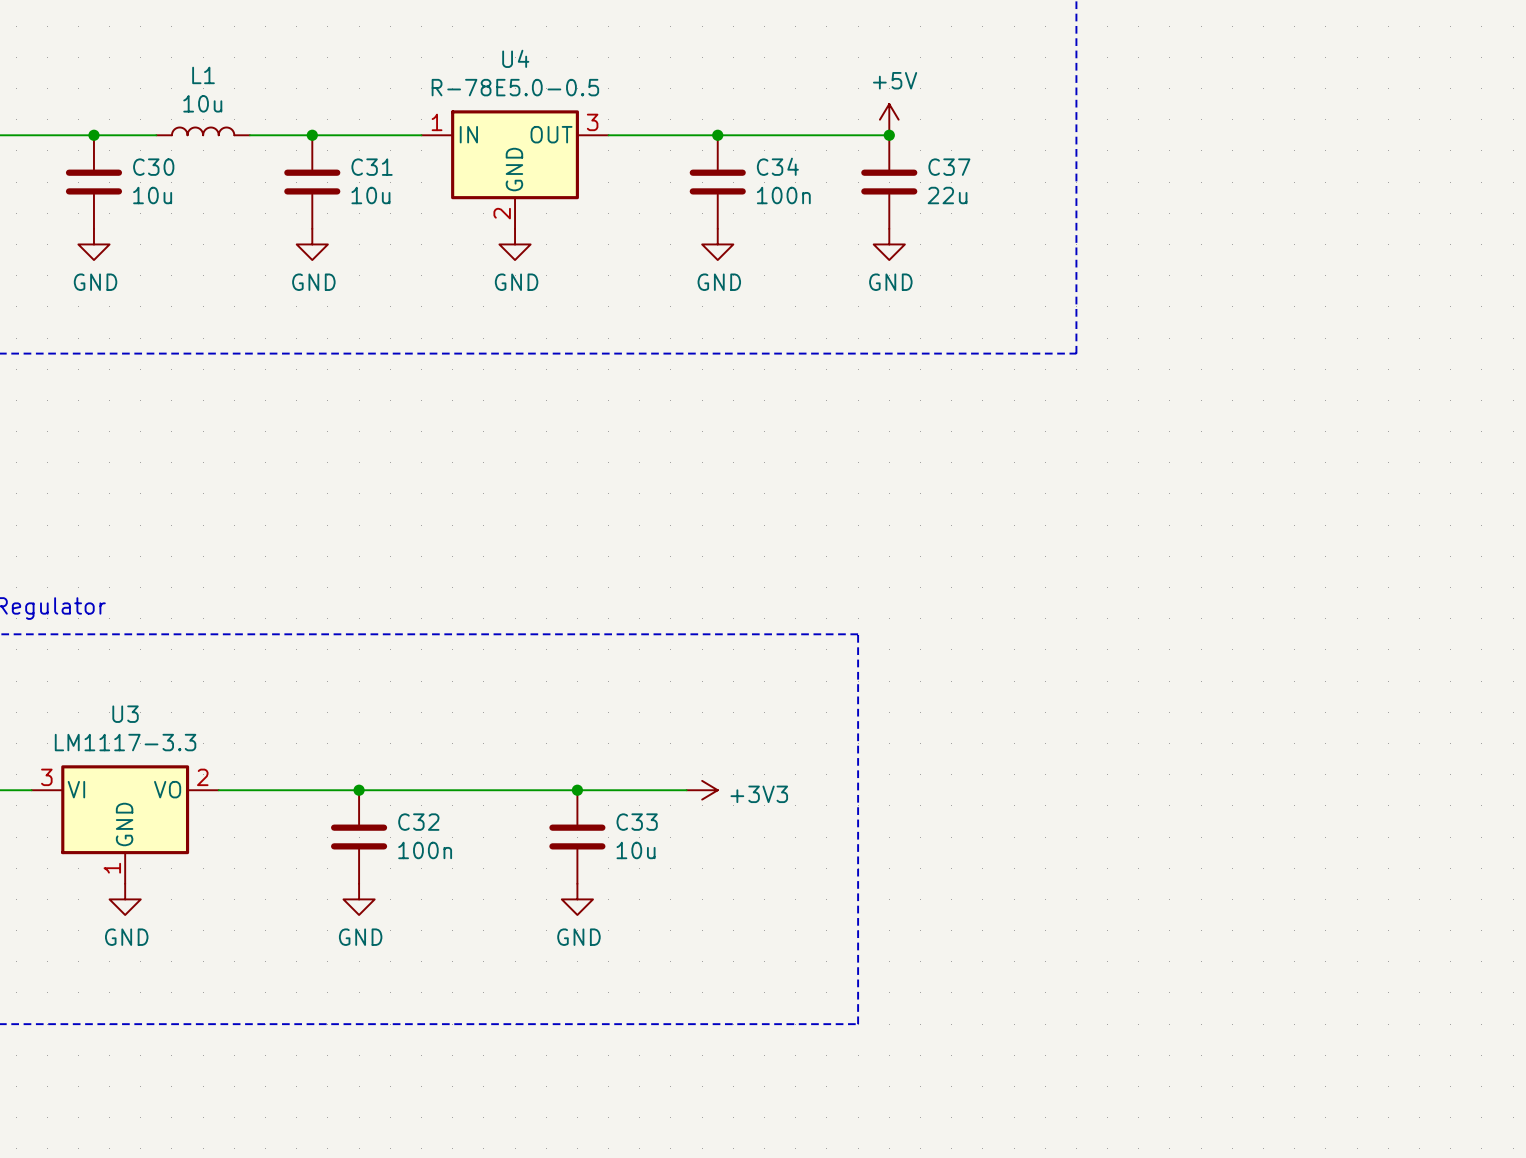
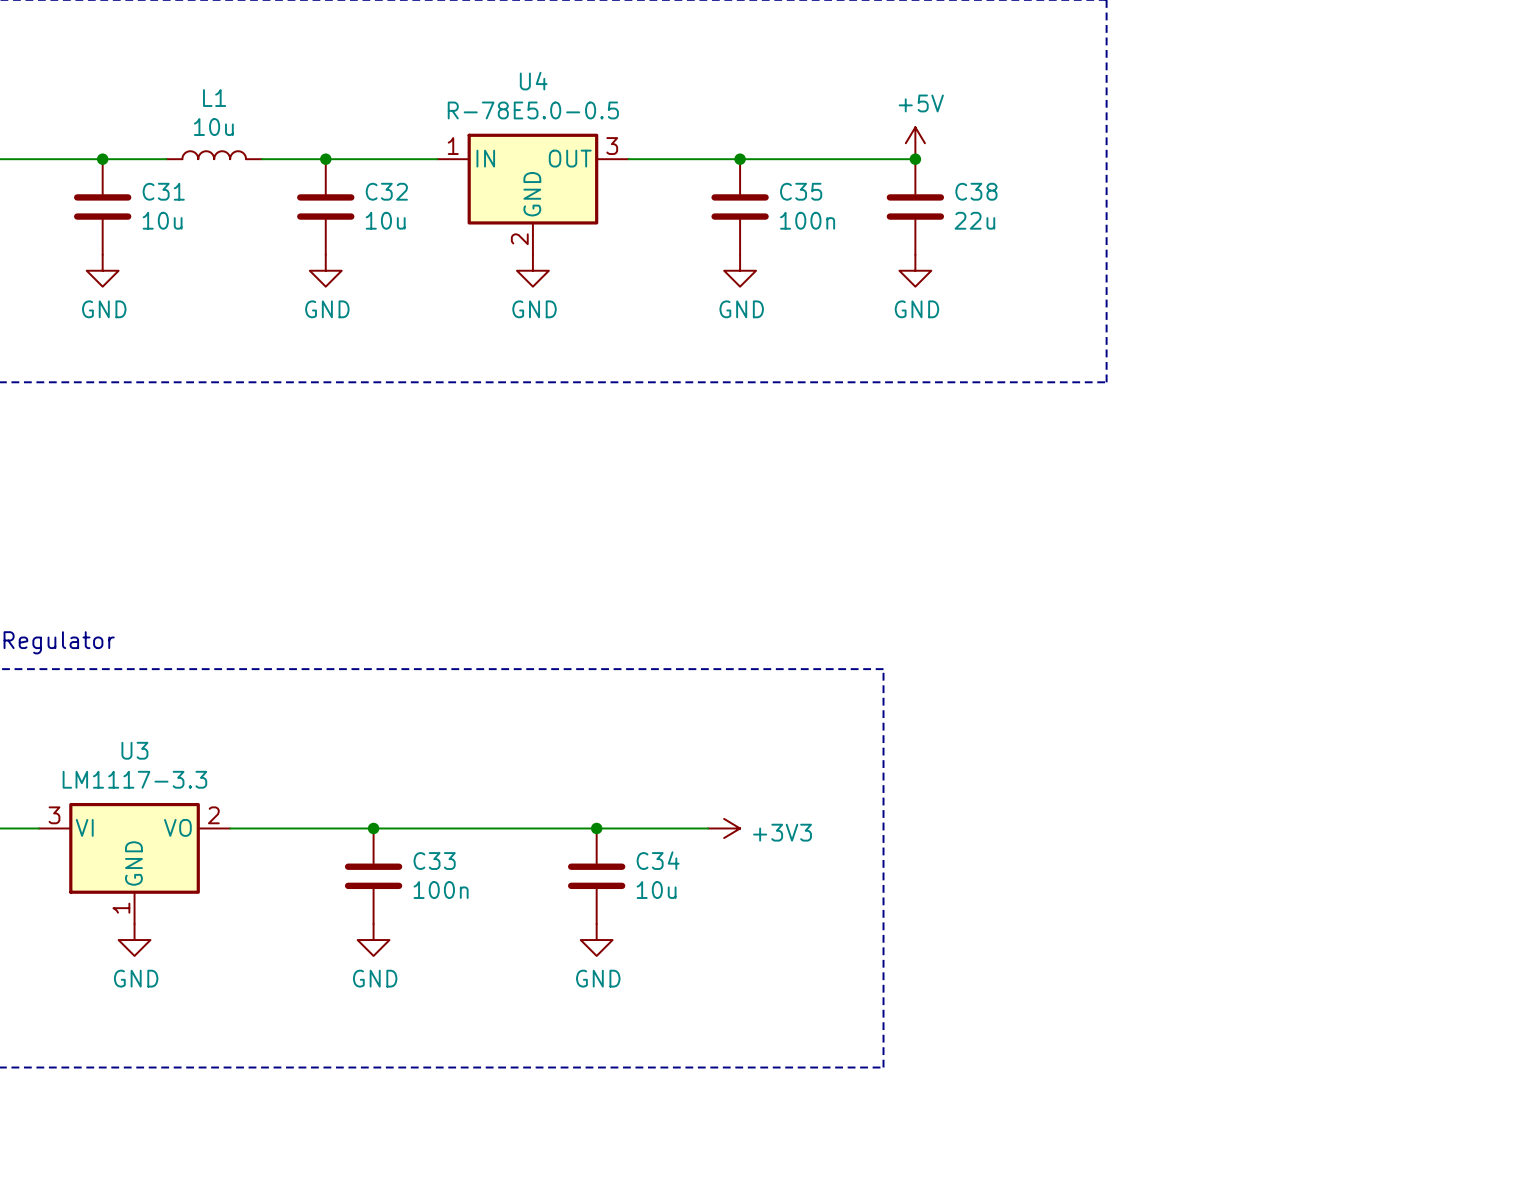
C34 name: C34 (777, 166) -> C35 (801, 191)
C30 name: C30 (153, 167) -> C31 (163, 191)
C31 name: C31 (372, 167) -> C32 (386, 191)
C37 name: C37 (949, 167) -> C38 (976, 191)
C32 name: C32 (418, 822) -> C33 (434, 861)
C33 name: C33 (637, 822) -> C34 (658, 860)

